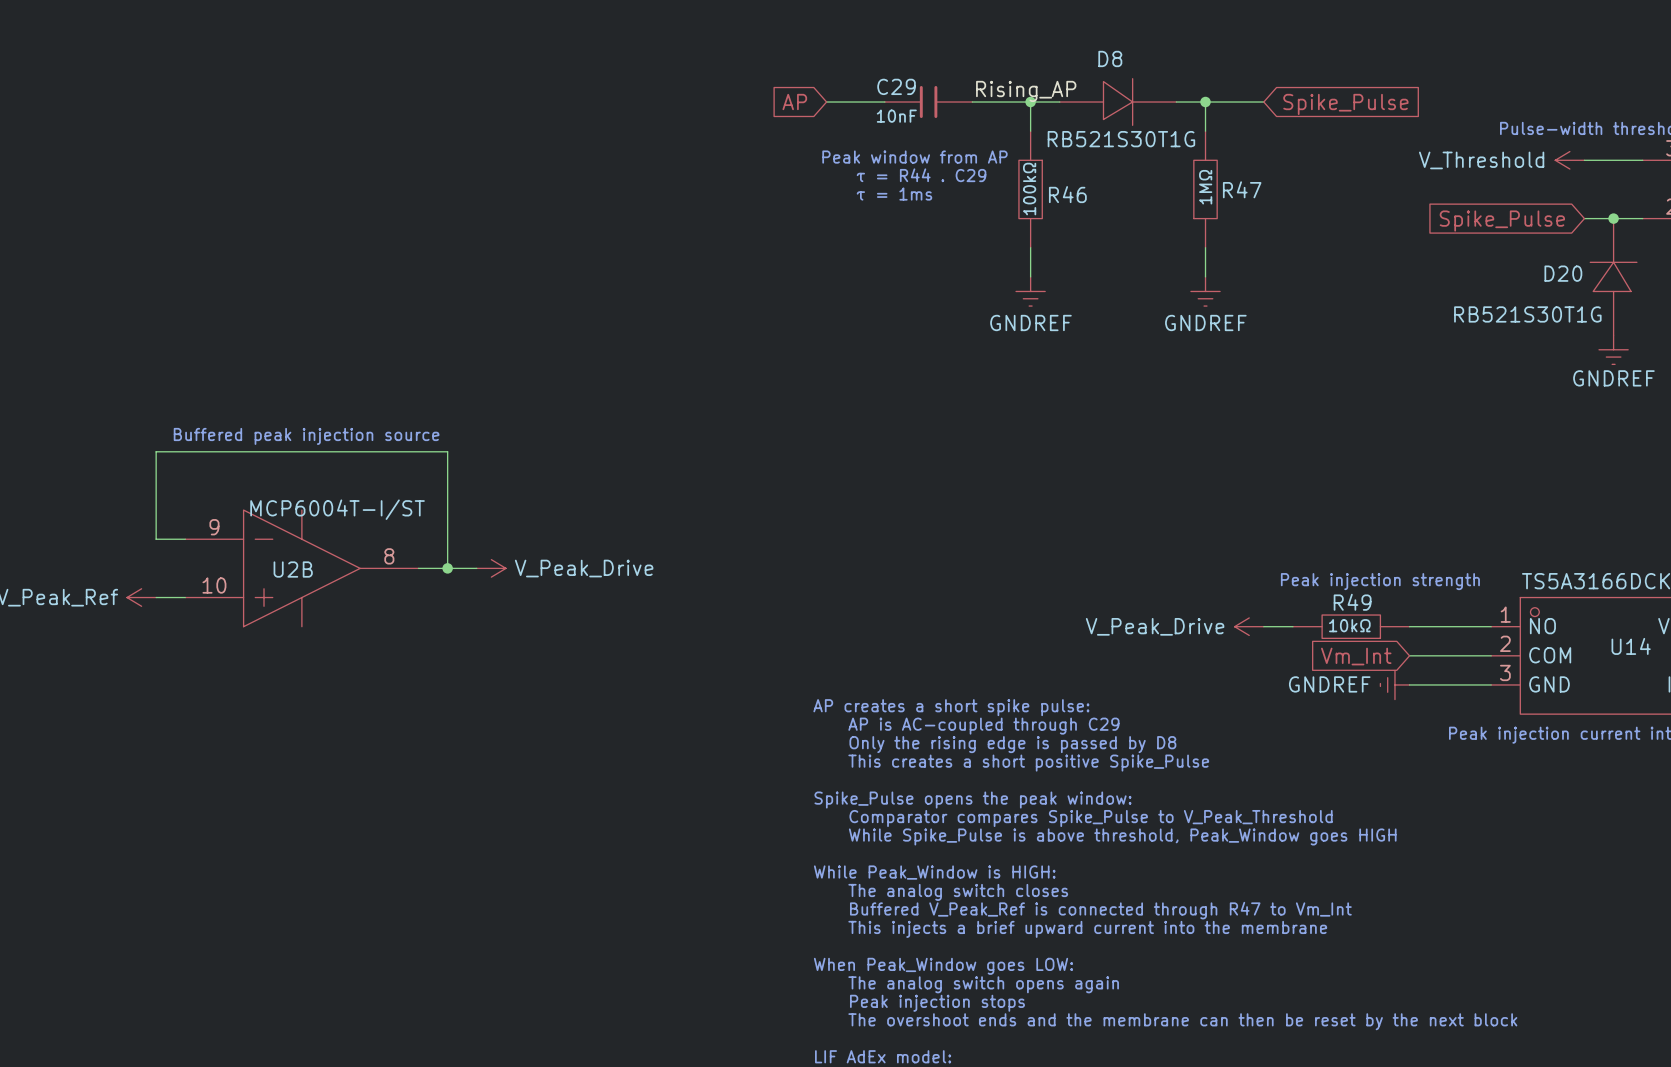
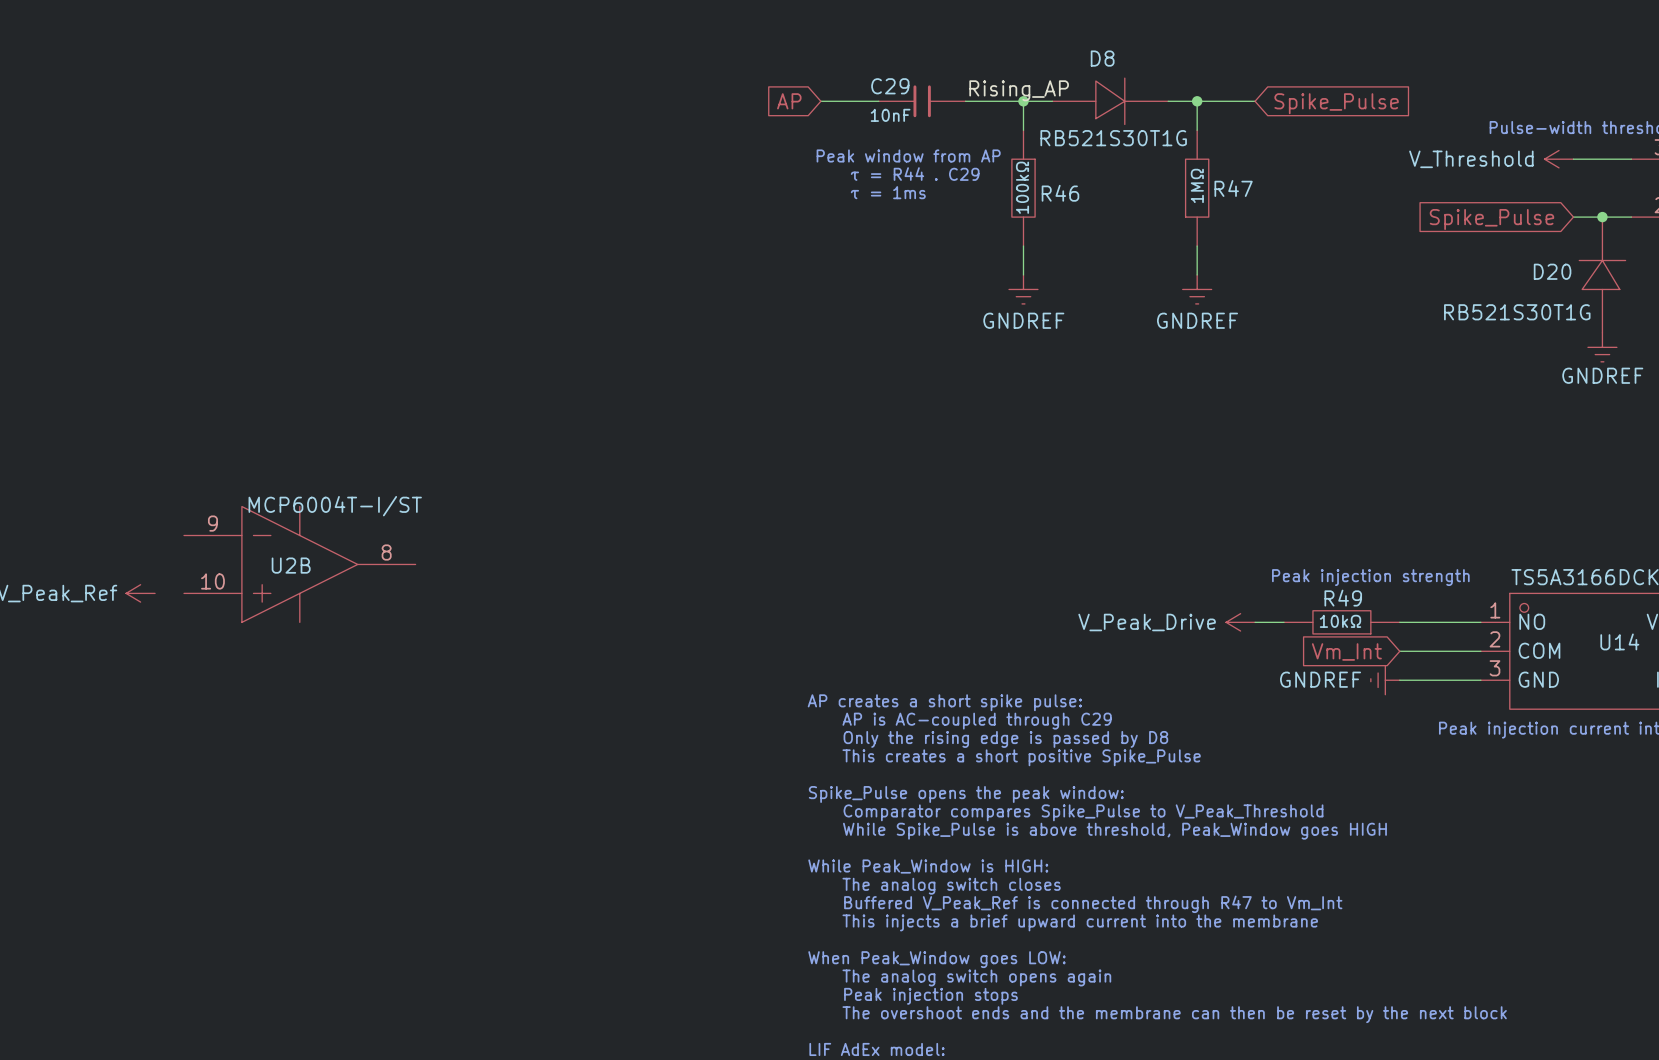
text: Buffered peak injection source (306, 436) -> none
wire: (185, 539) (156, 539) (156, 451) (447, 451) (447, 568) -> none
wire: (418, 568) (476, 568) -> none
junction: (447, 568) -> none
power symbol: V_Peak_Drive (491, 568) -> none
wire: (156, 597) (185, 597) -> none

